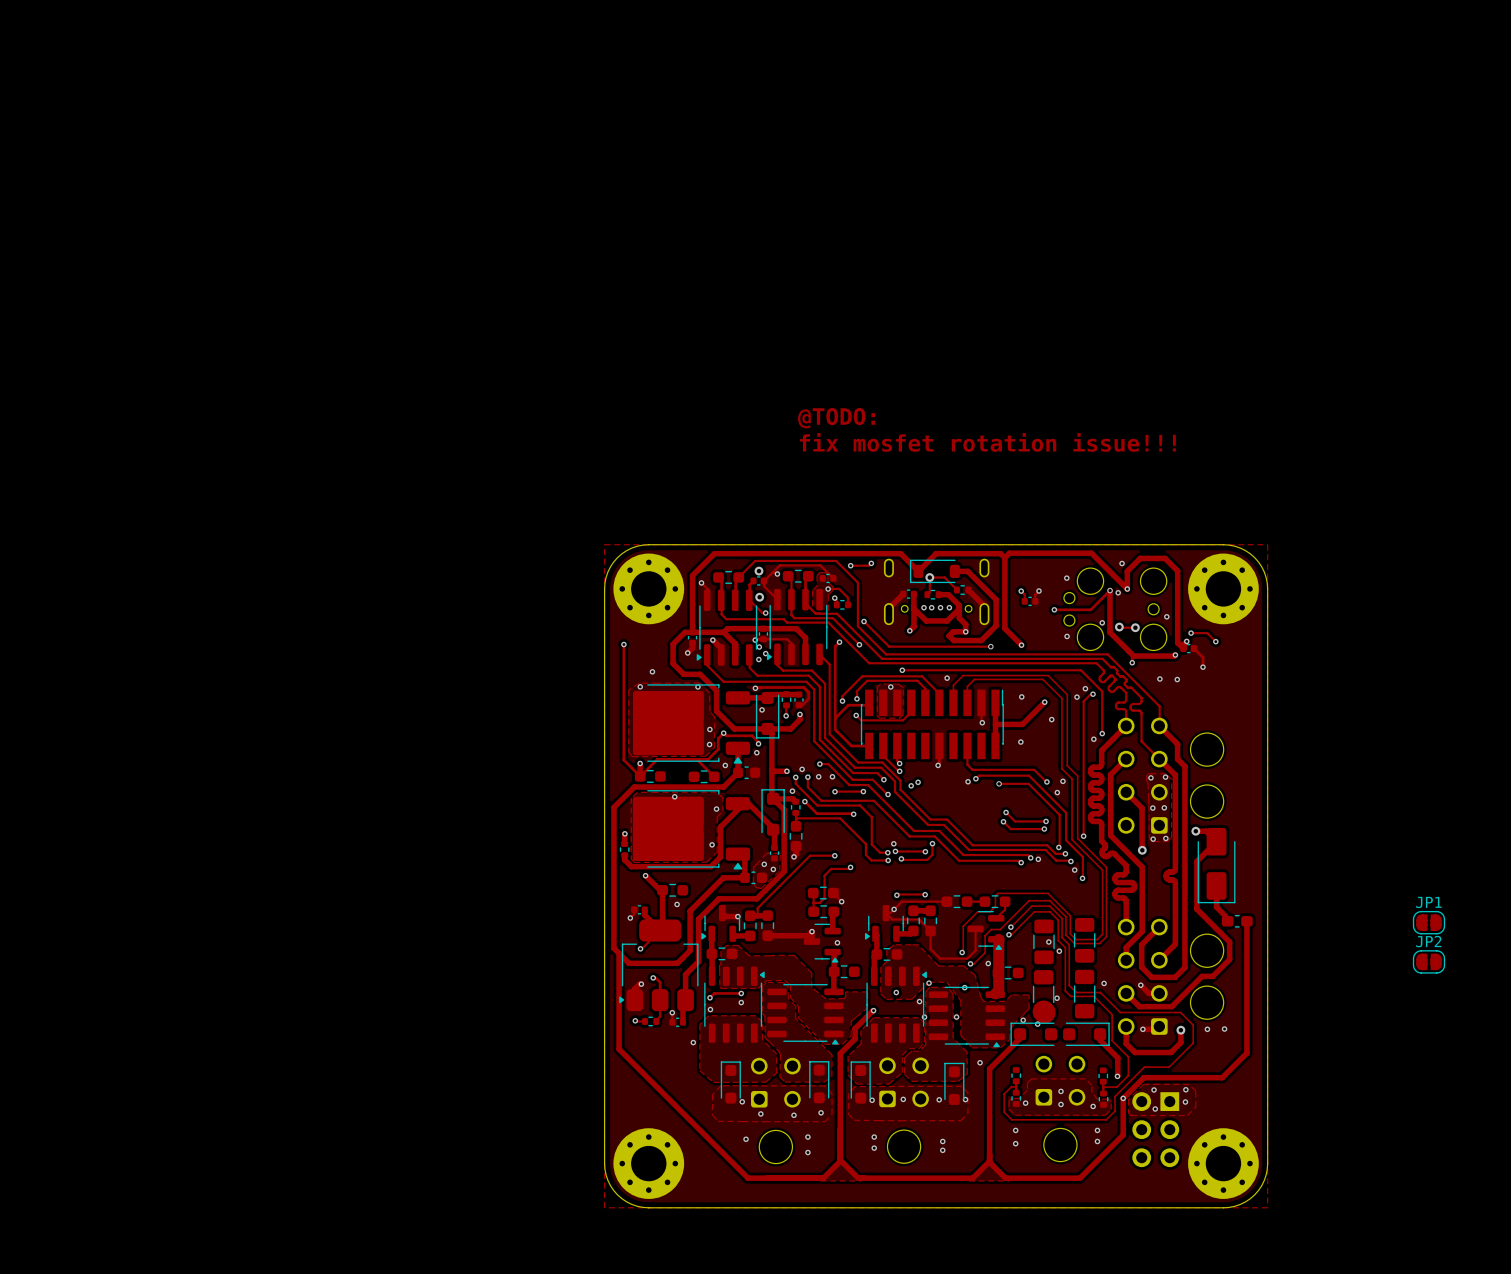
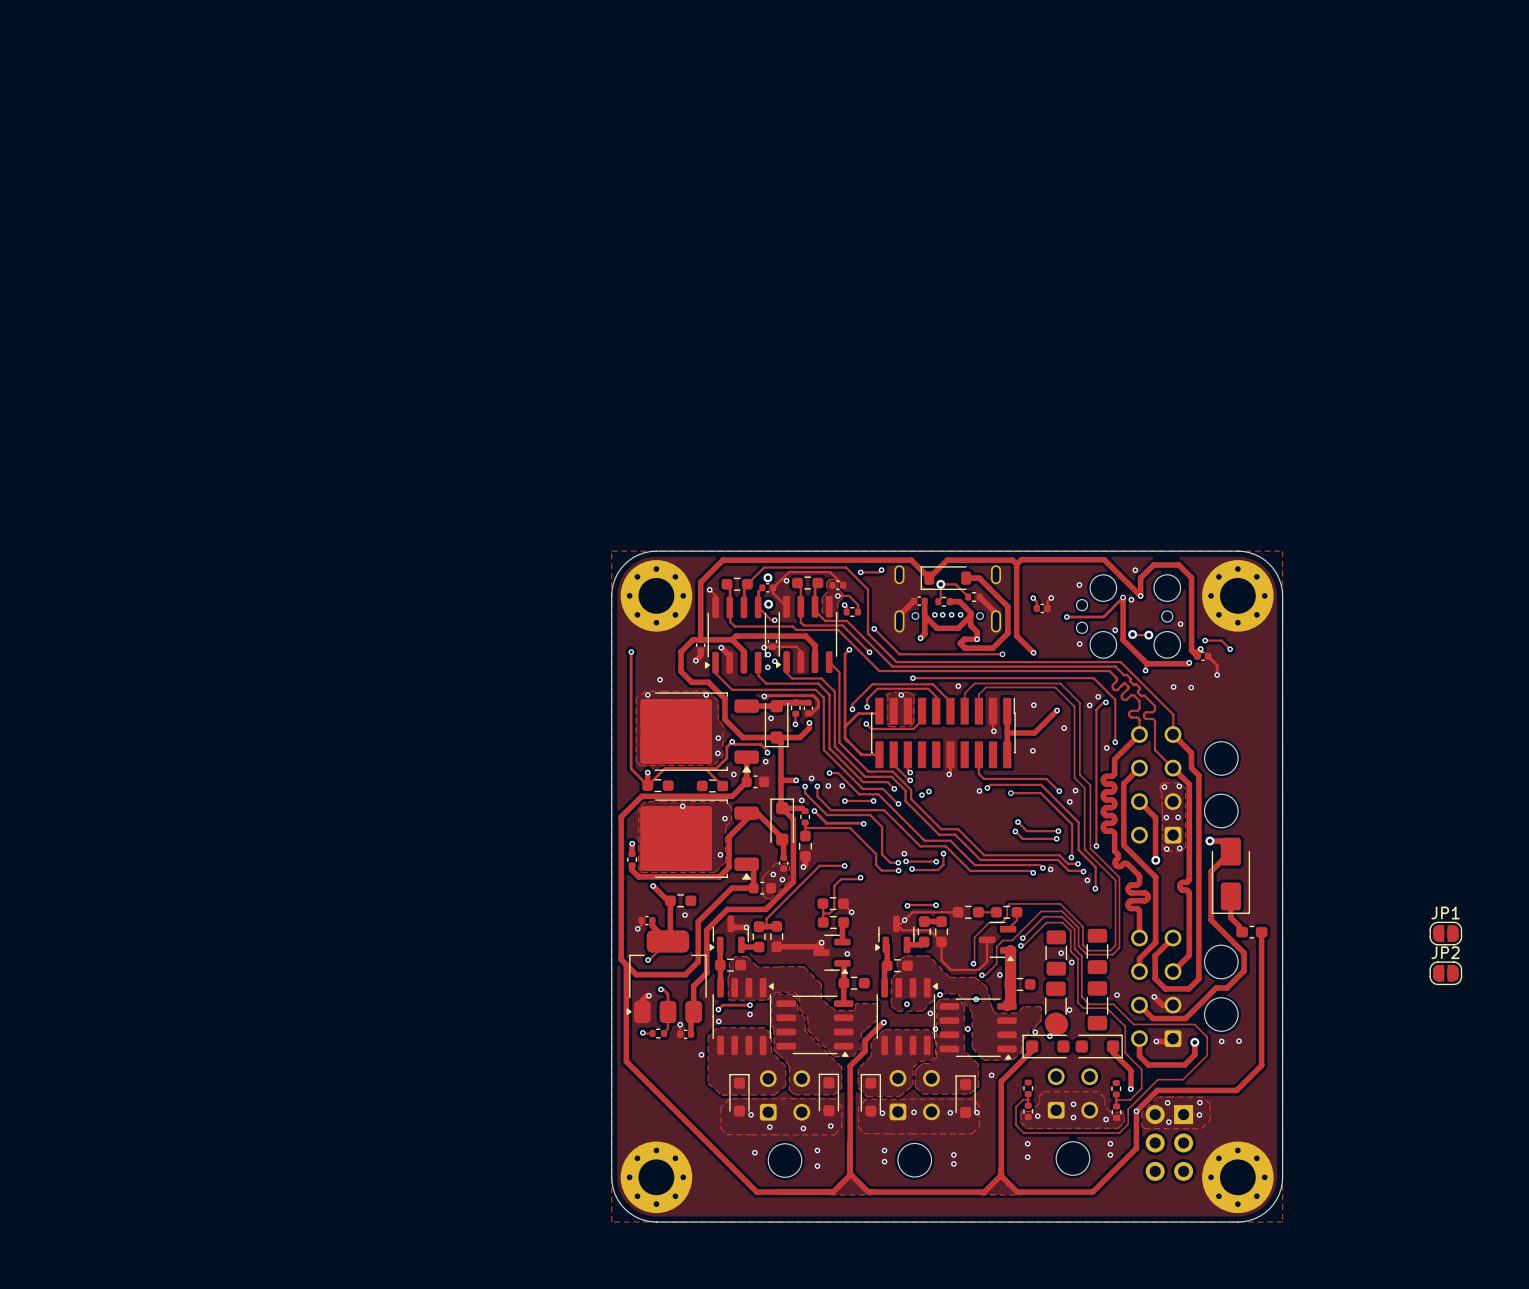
text: @TODO: (836, 418) -> none
text: fix mosfet rotation issue!!! (987, 442) -> none

